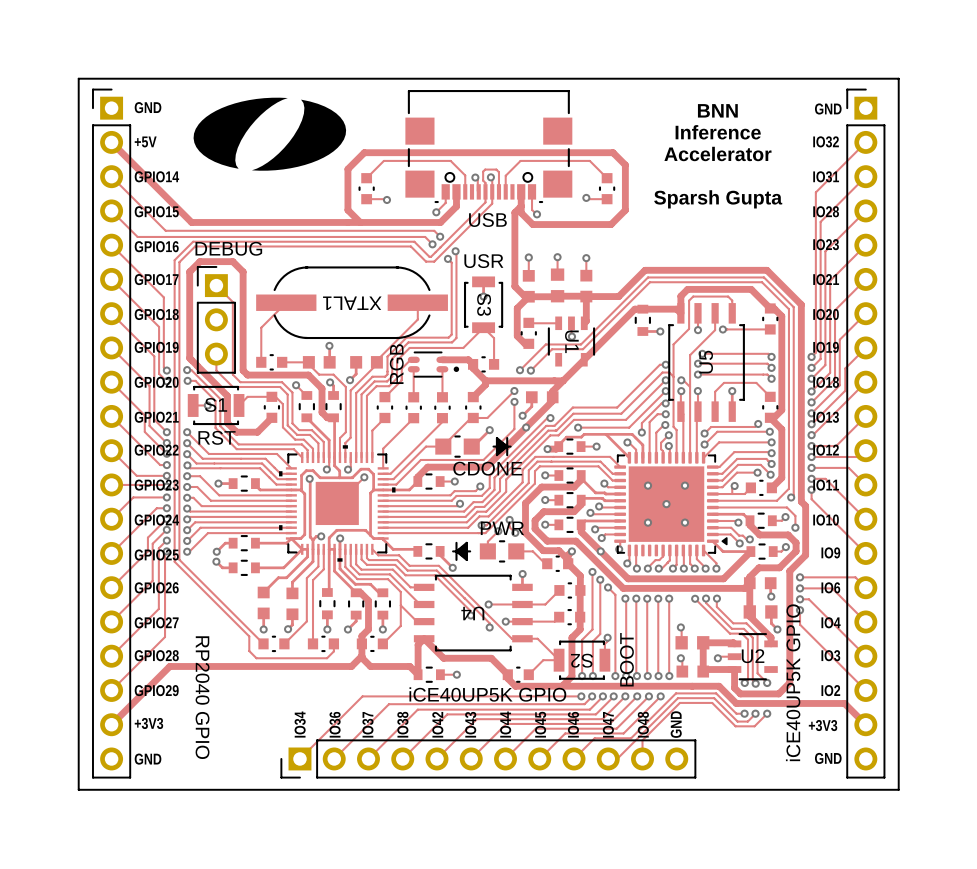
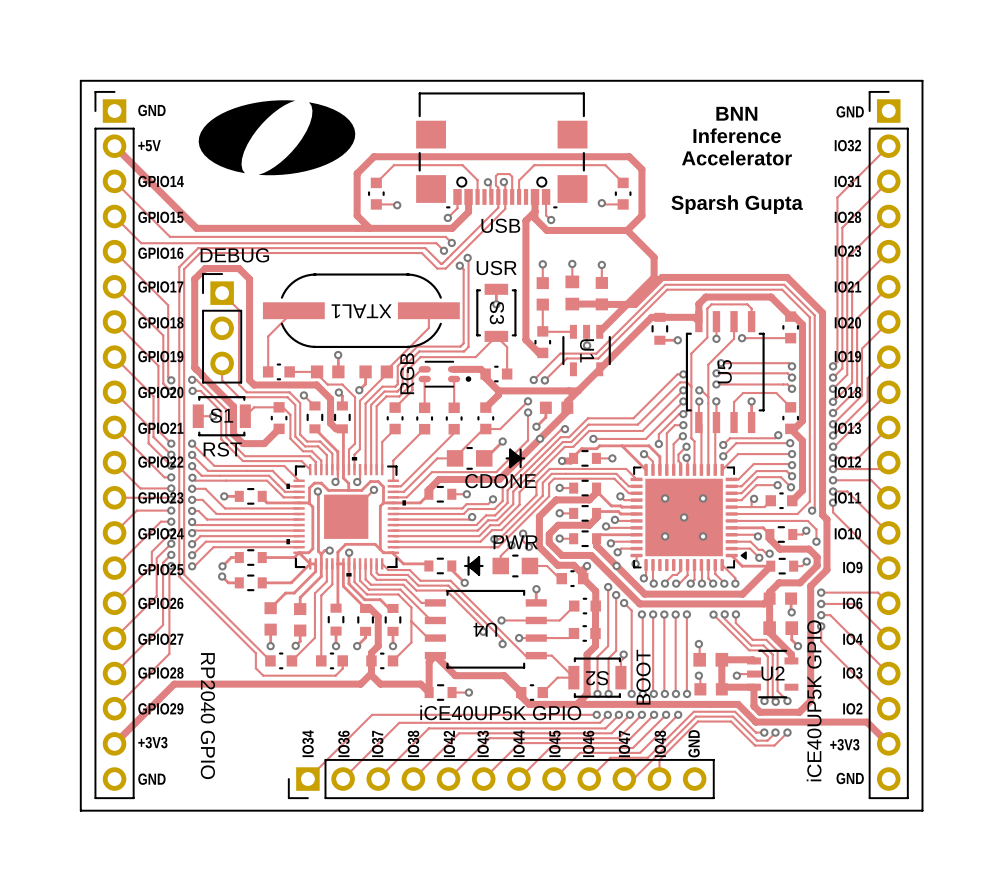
track: (514, 212) (514, 286) (525, 296) (557, 296) -> (528, 218) (525, 220) (525, 339) (530, 344)
track: none -> (542, 302) (542, 331)
track: (528, 296) (517, 308) (517, 336) -> none
track: (586, 296) (586, 321) -> (627, 230) (654, 257) (654, 277) (601, 329)

